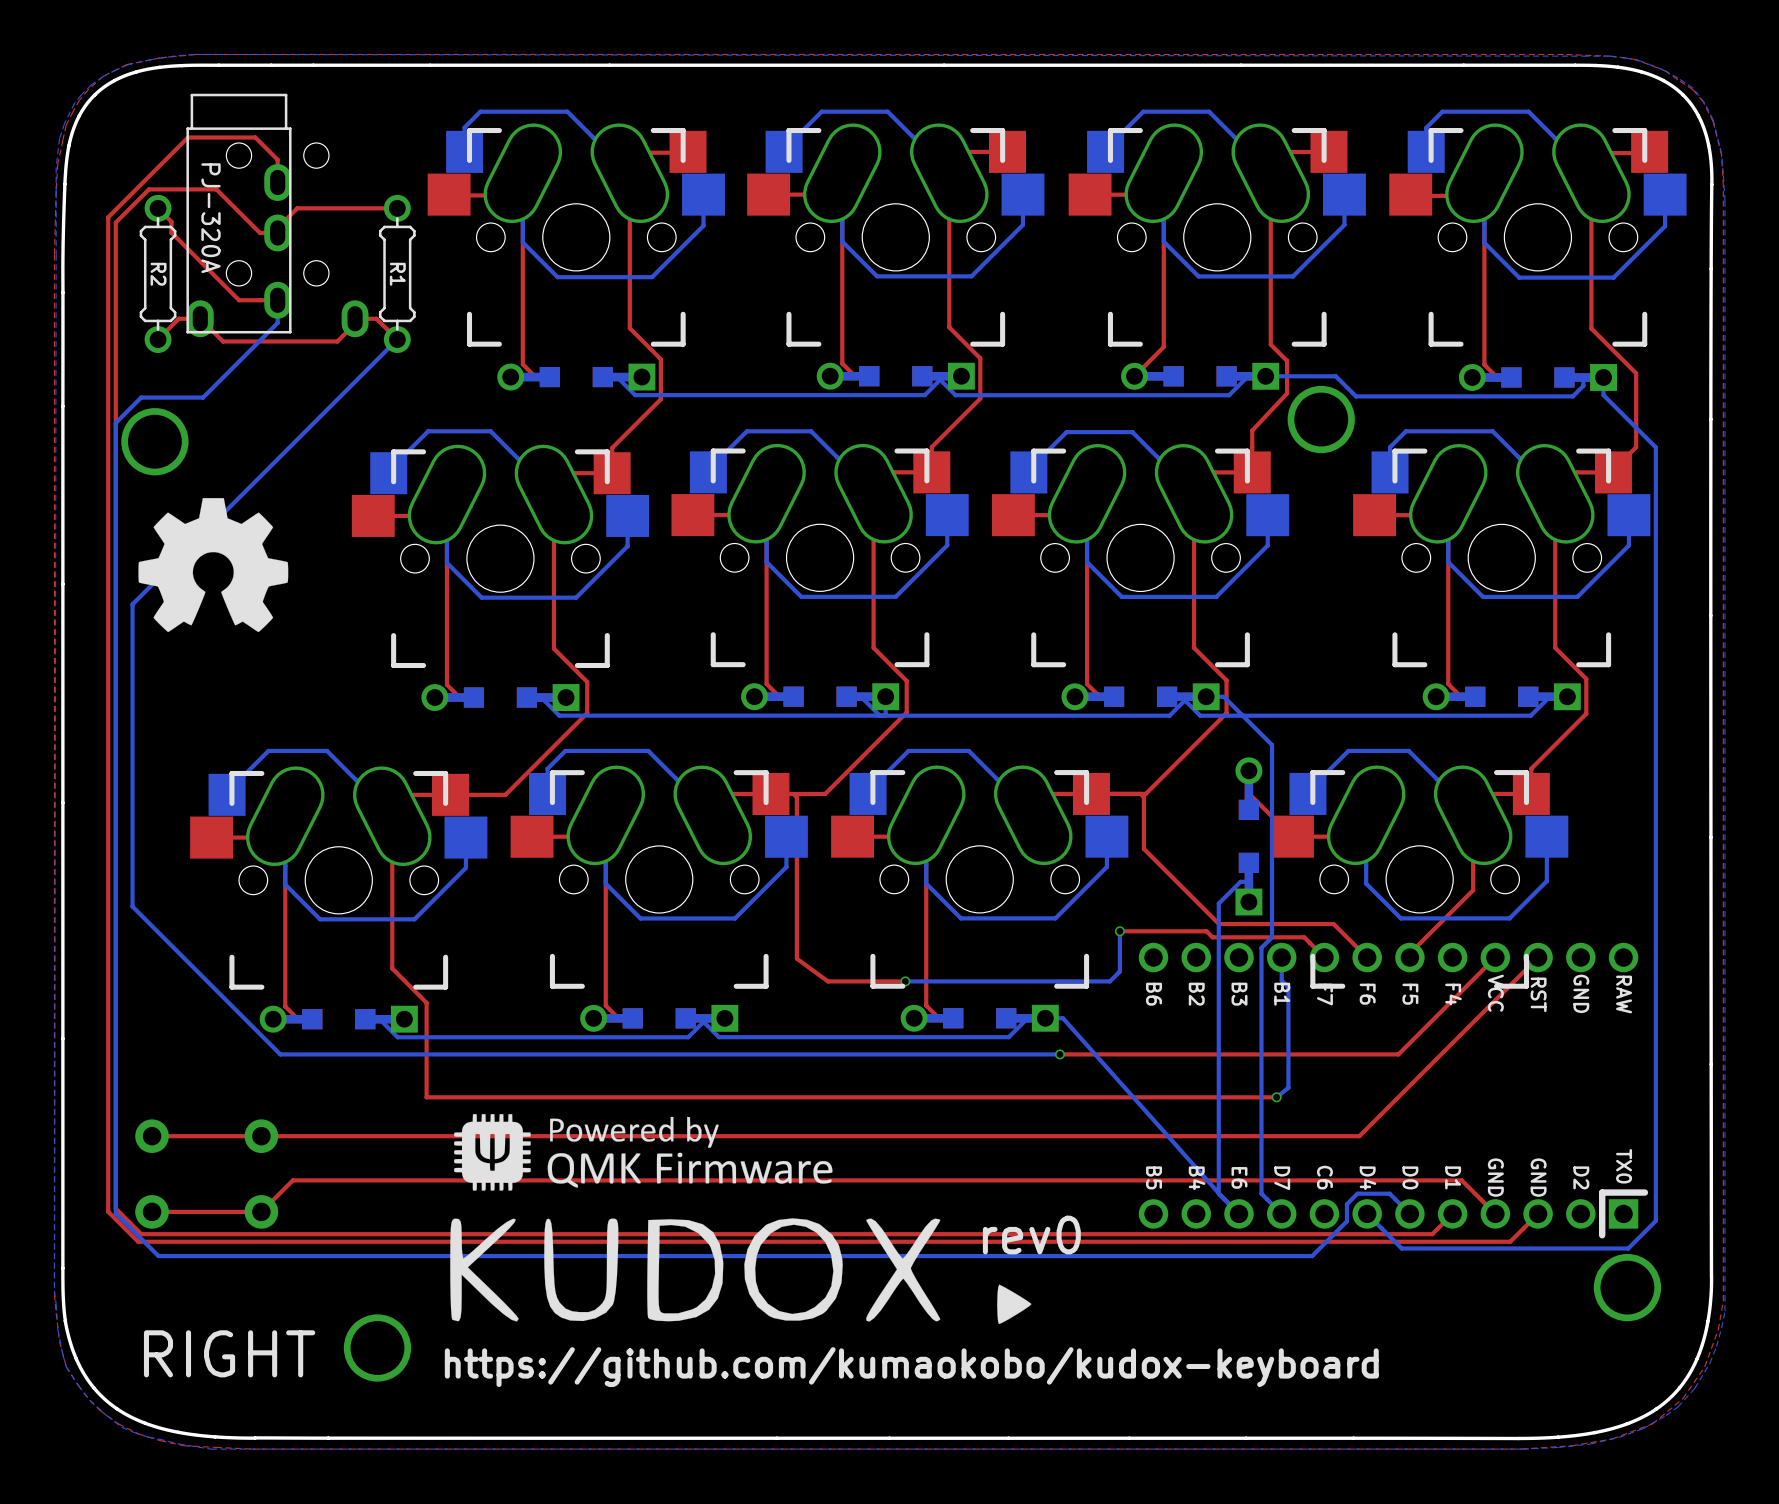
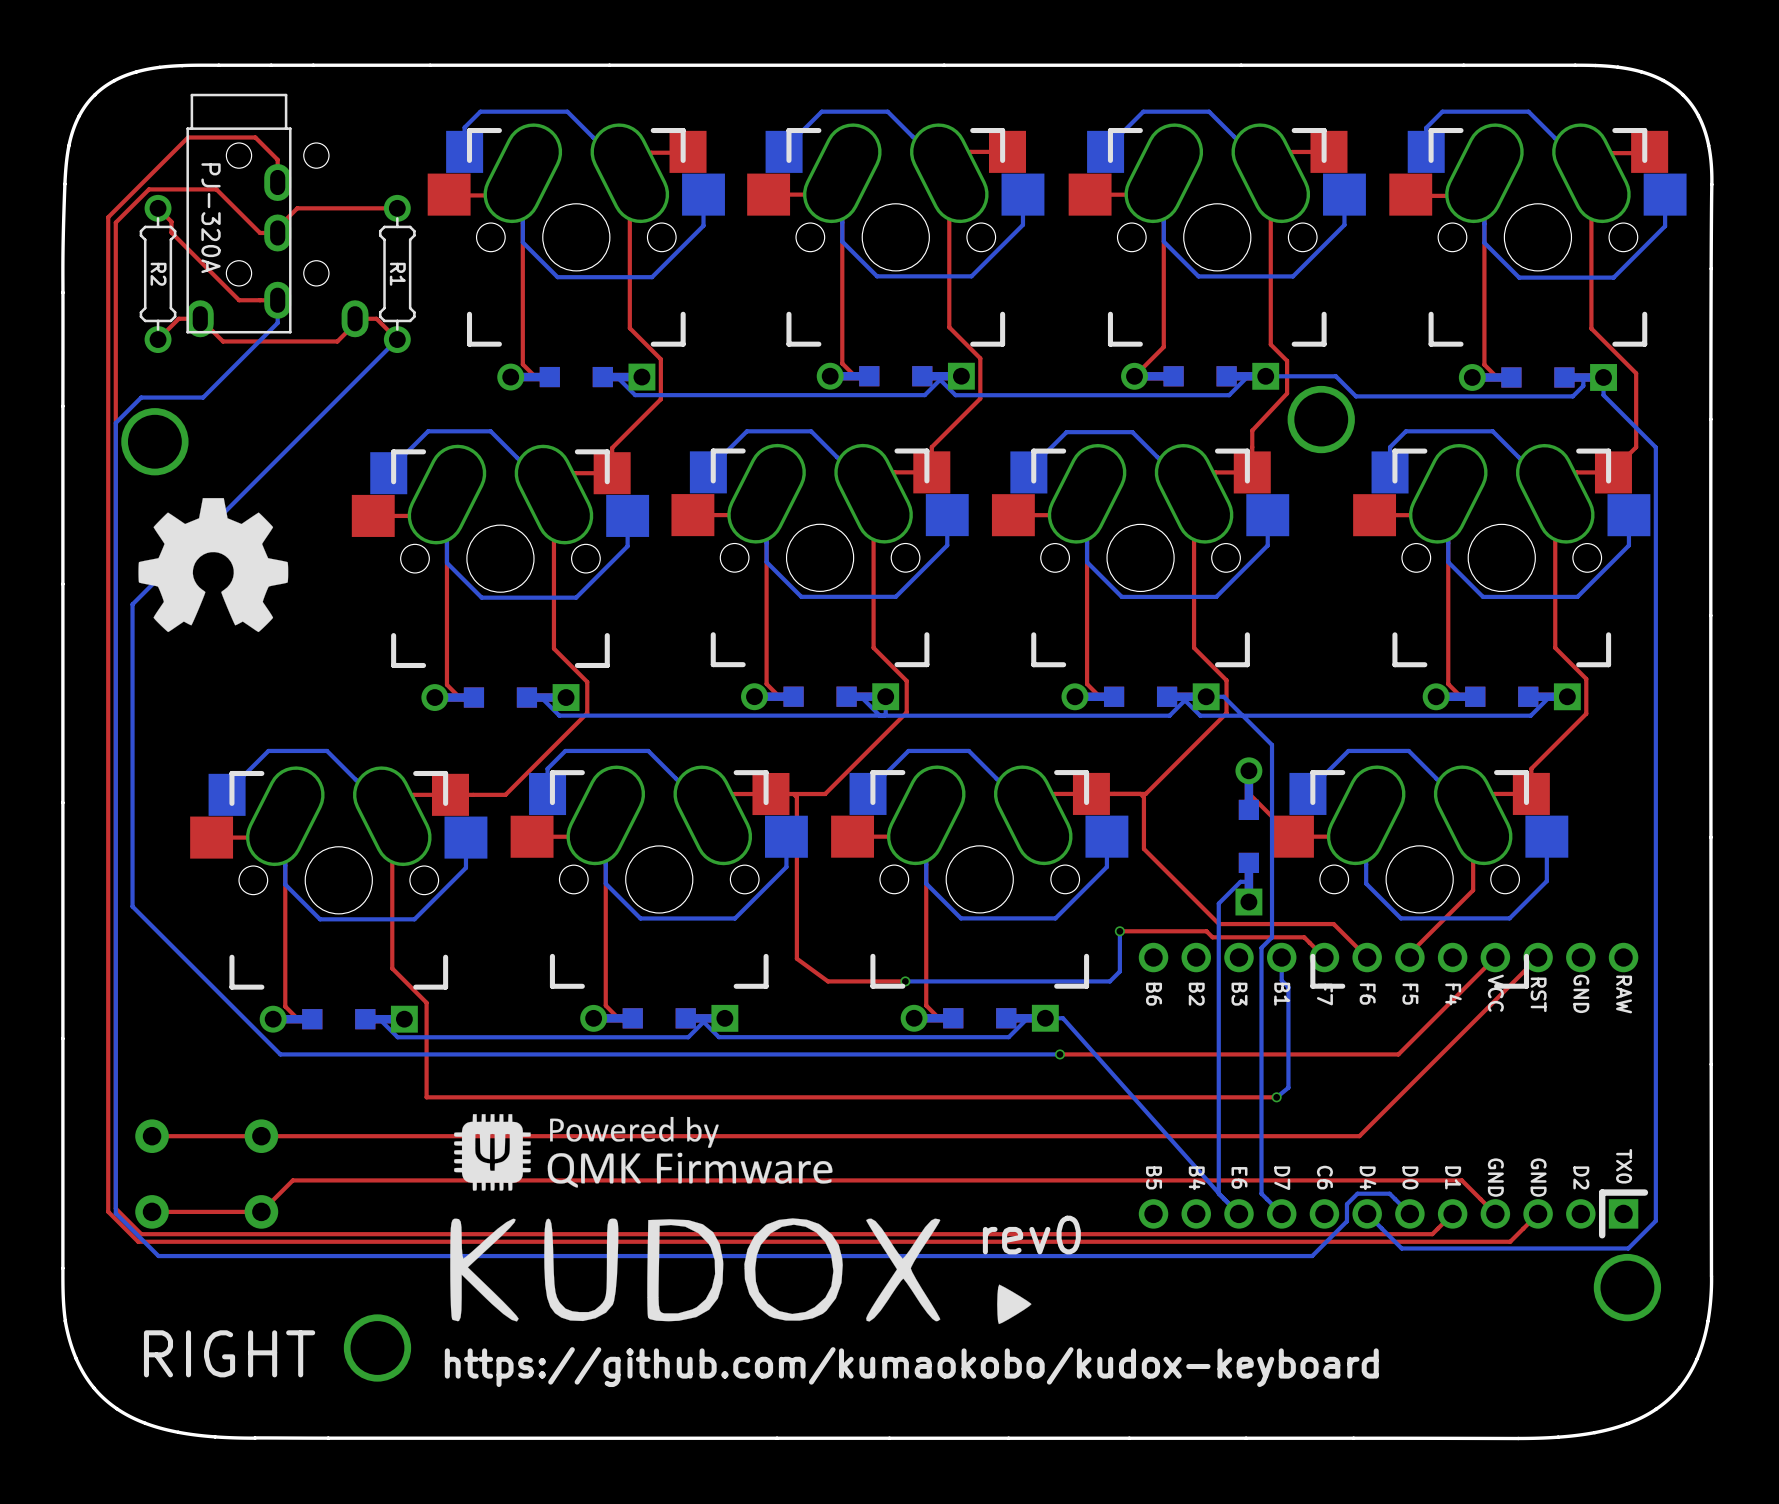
bottom zone outline: (194, 54) (1608, 56) (1640, 61) (1662, 69) (1693, 88) (1704, 103) (1713, 120) (1721, 153) (1725, 200) (1725, 1311) (1716, 1346) (1709, 1363) (1694, 1388) (1677, 1407) (1666, 1415) (1642, 1428) (1619, 1437) (1590, 1444) (1523, 1449) (210, 1449) (148, 1437) (121, 1427) (106, 1415) (89, 1400) (66, 1366) (57, 1329) (54, 1290) (56, 167) (59, 138) (64, 123) (74, 103) (91, 84) (103, 76) (128, 64) (194, 54) -> none
top zone outline: (1563, 54) (1610, 56) (1635, 59) (1666, 71) (1693, 89) (1703, 101) (1713, 121) (1721, 155) (1723, 185) (1723, 1301) (1718, 1329) (1704, 1366) (1682, 1398) (1652, 1423) (1612, 1439) (1571, 1445) (1521, 1449) (252, 1449) (184, 1445) (160, 1440) (138, 1433) (118, 1423) (89, 1400) (66, 1366) (59, 1341) (54, 1294) (54, 254) (56, 190) (57, 163) (66, 125) (79, 99) (88, 89) (103, 76) (126, 64) (160, 57) (195, 54) (1563, 54) -> none

